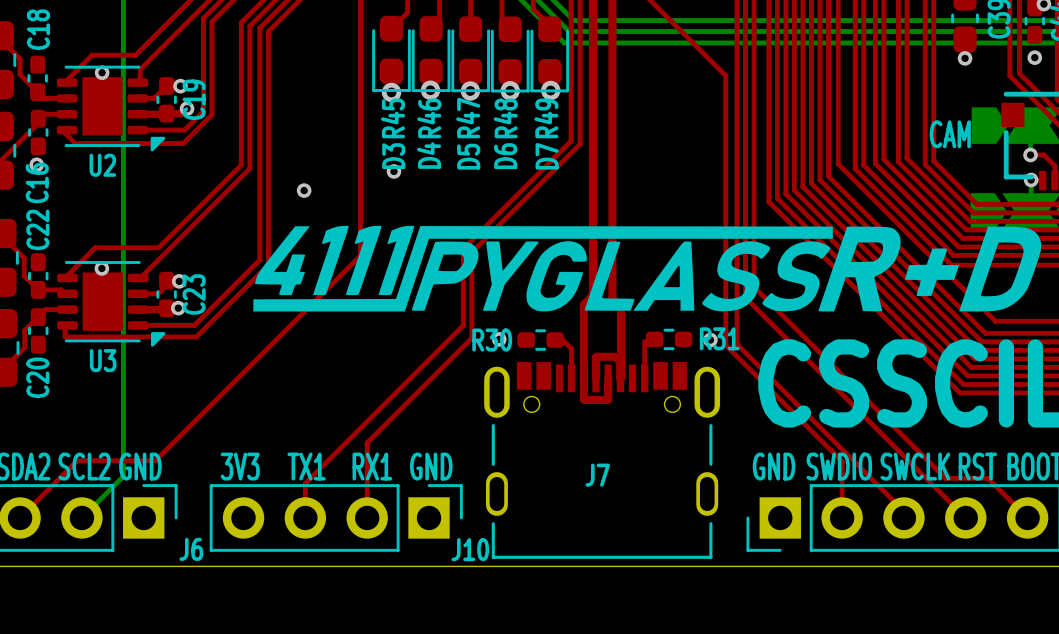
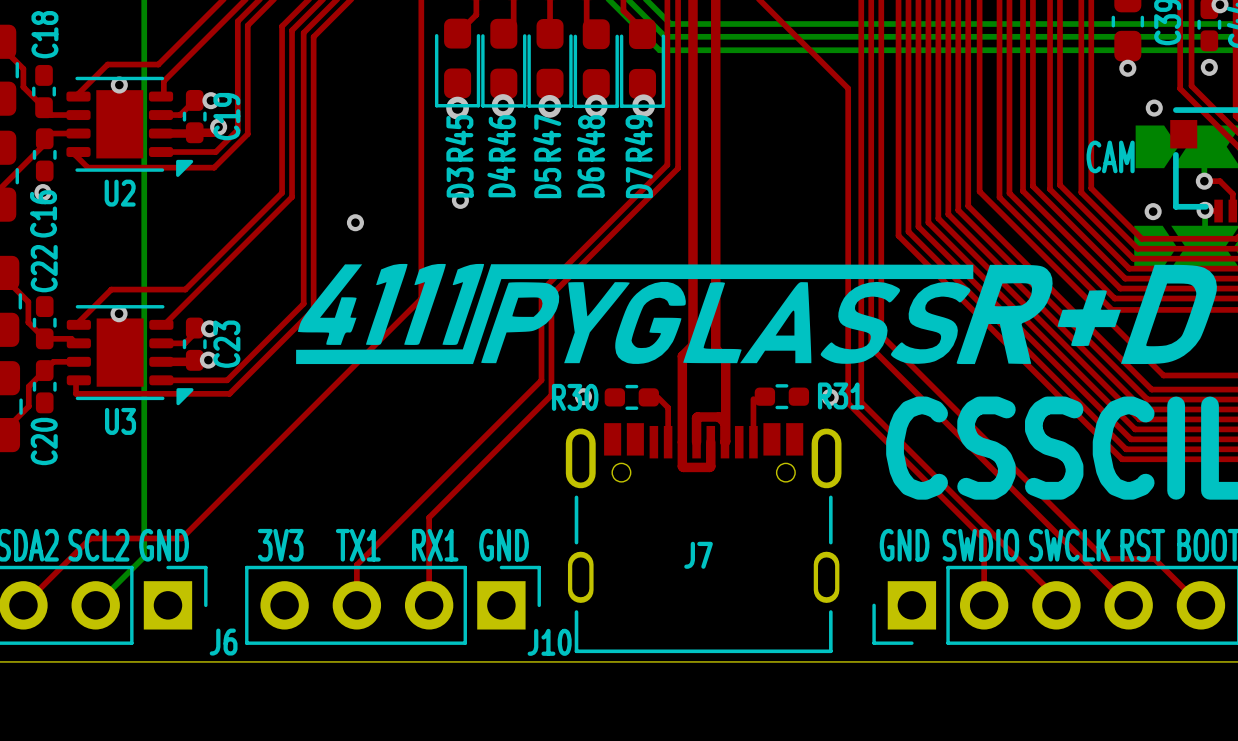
via: none -> (1154, 108)
via: none -> (1153, 211)

